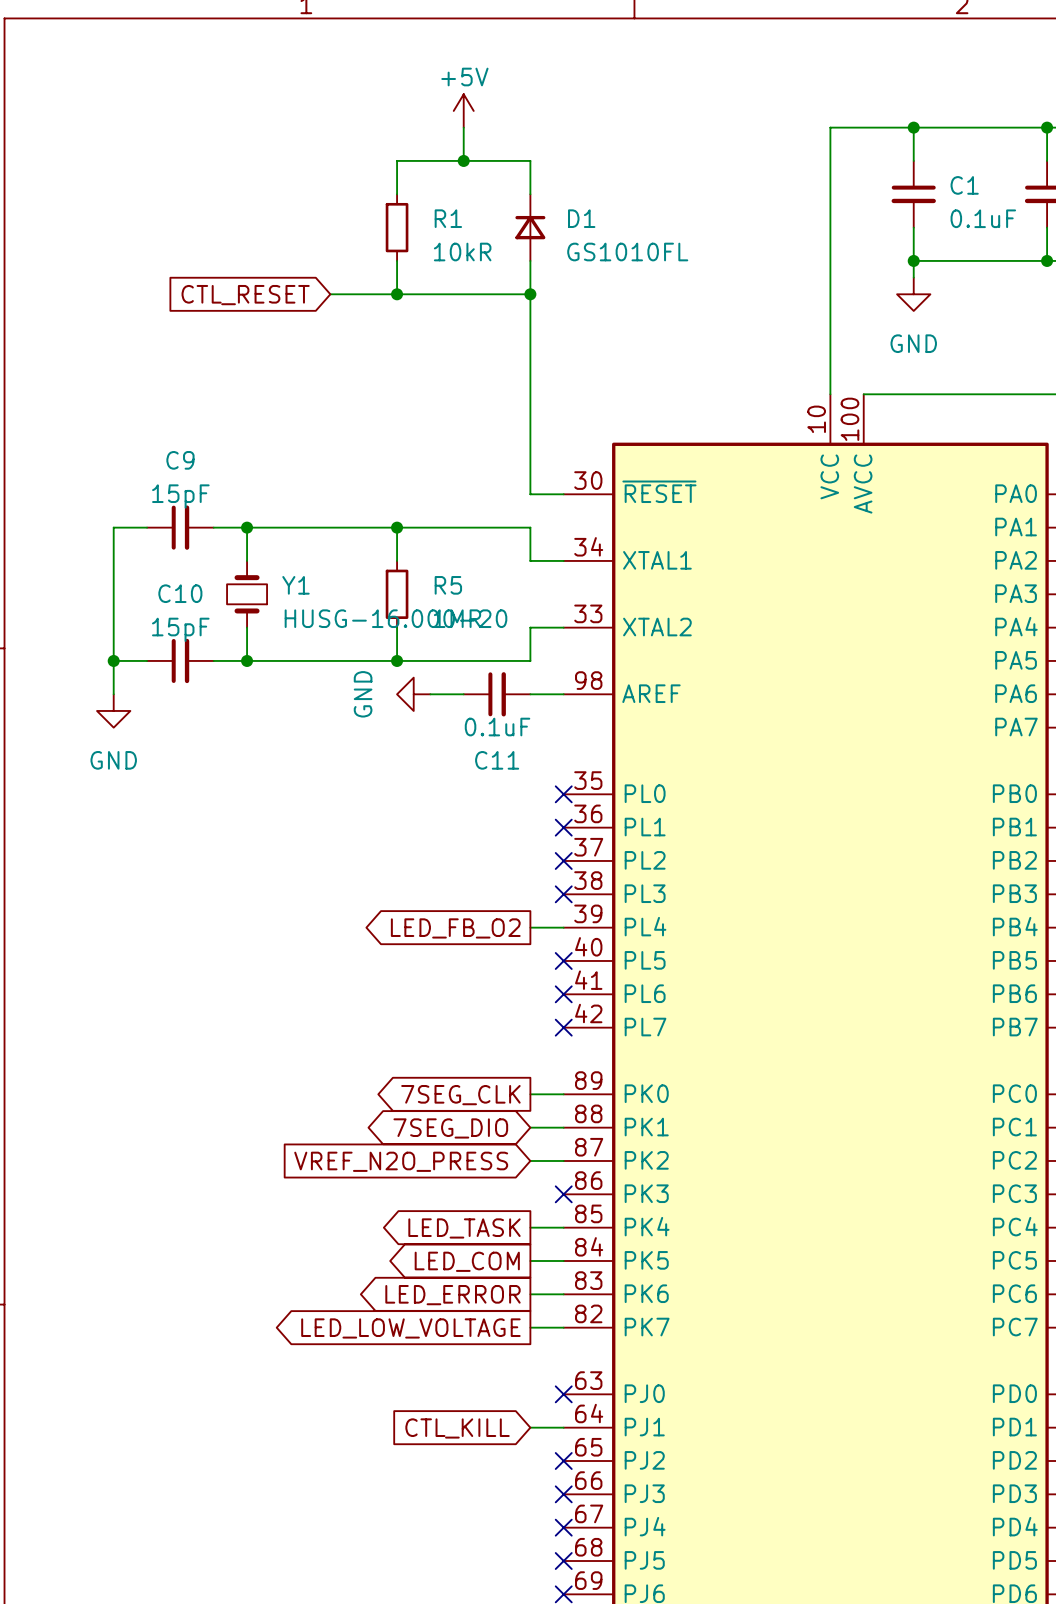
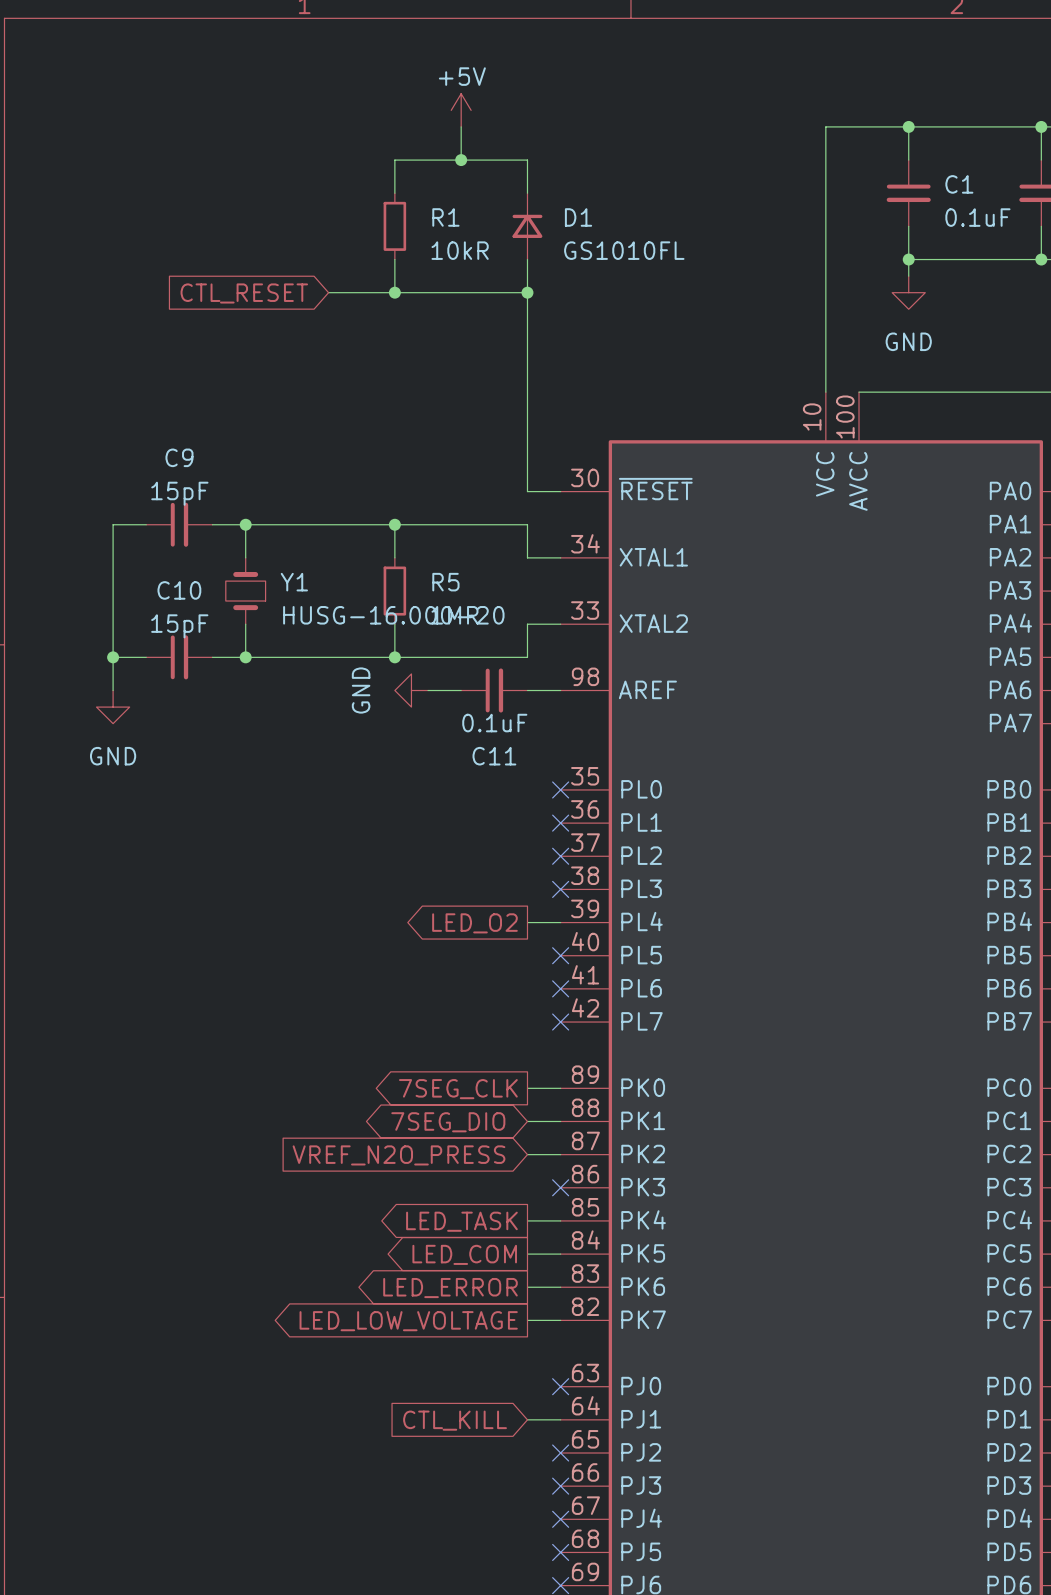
global label: LED_FB_O2 (455, 928) -> LED_O2 (474, 923)

